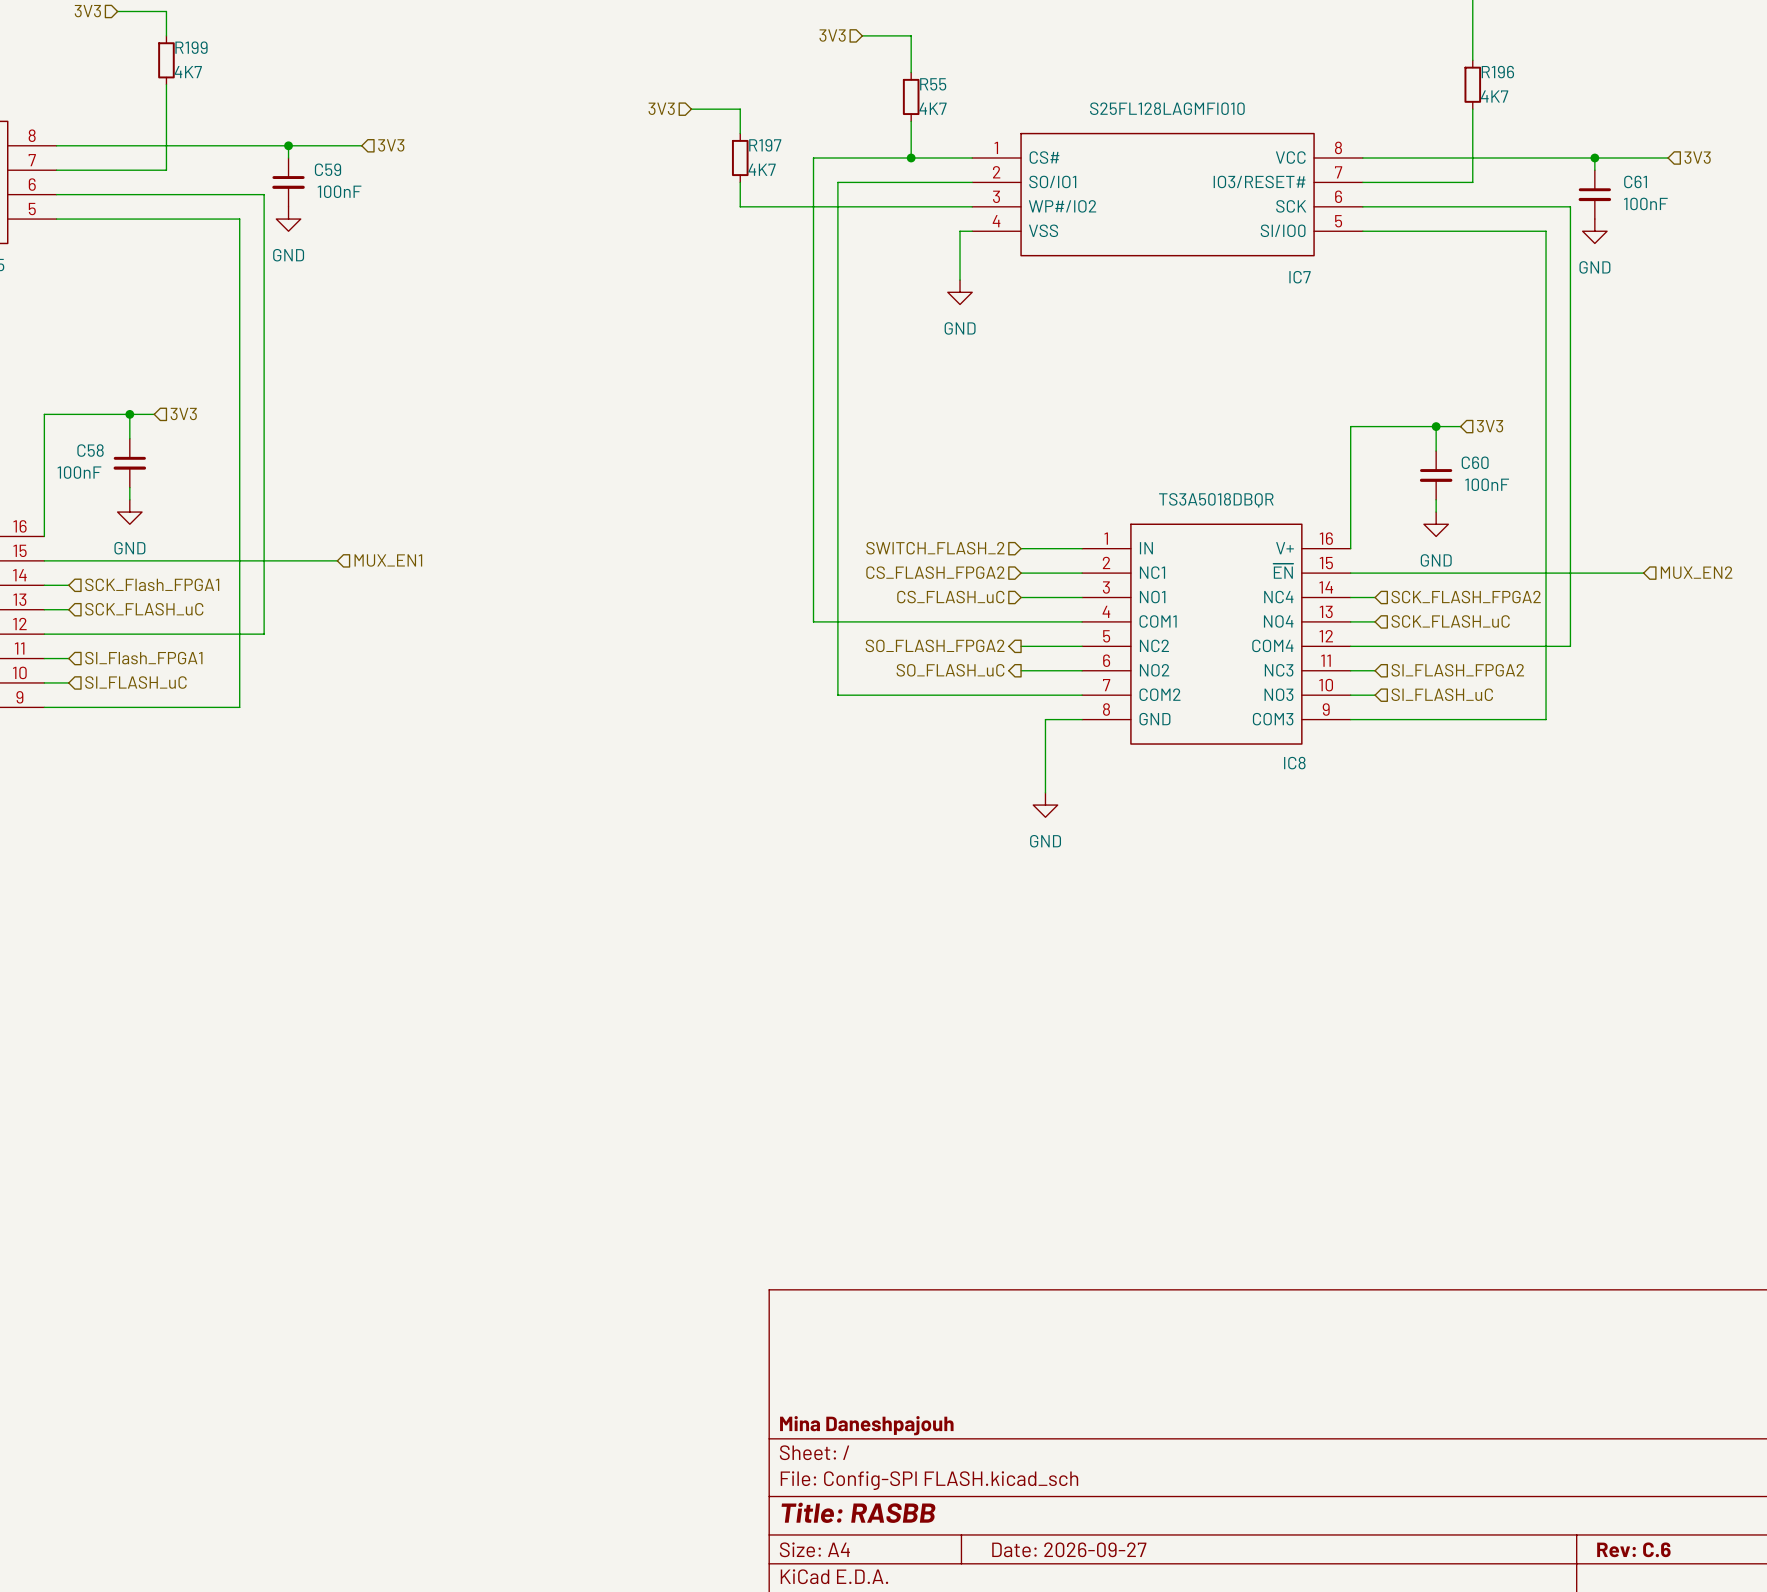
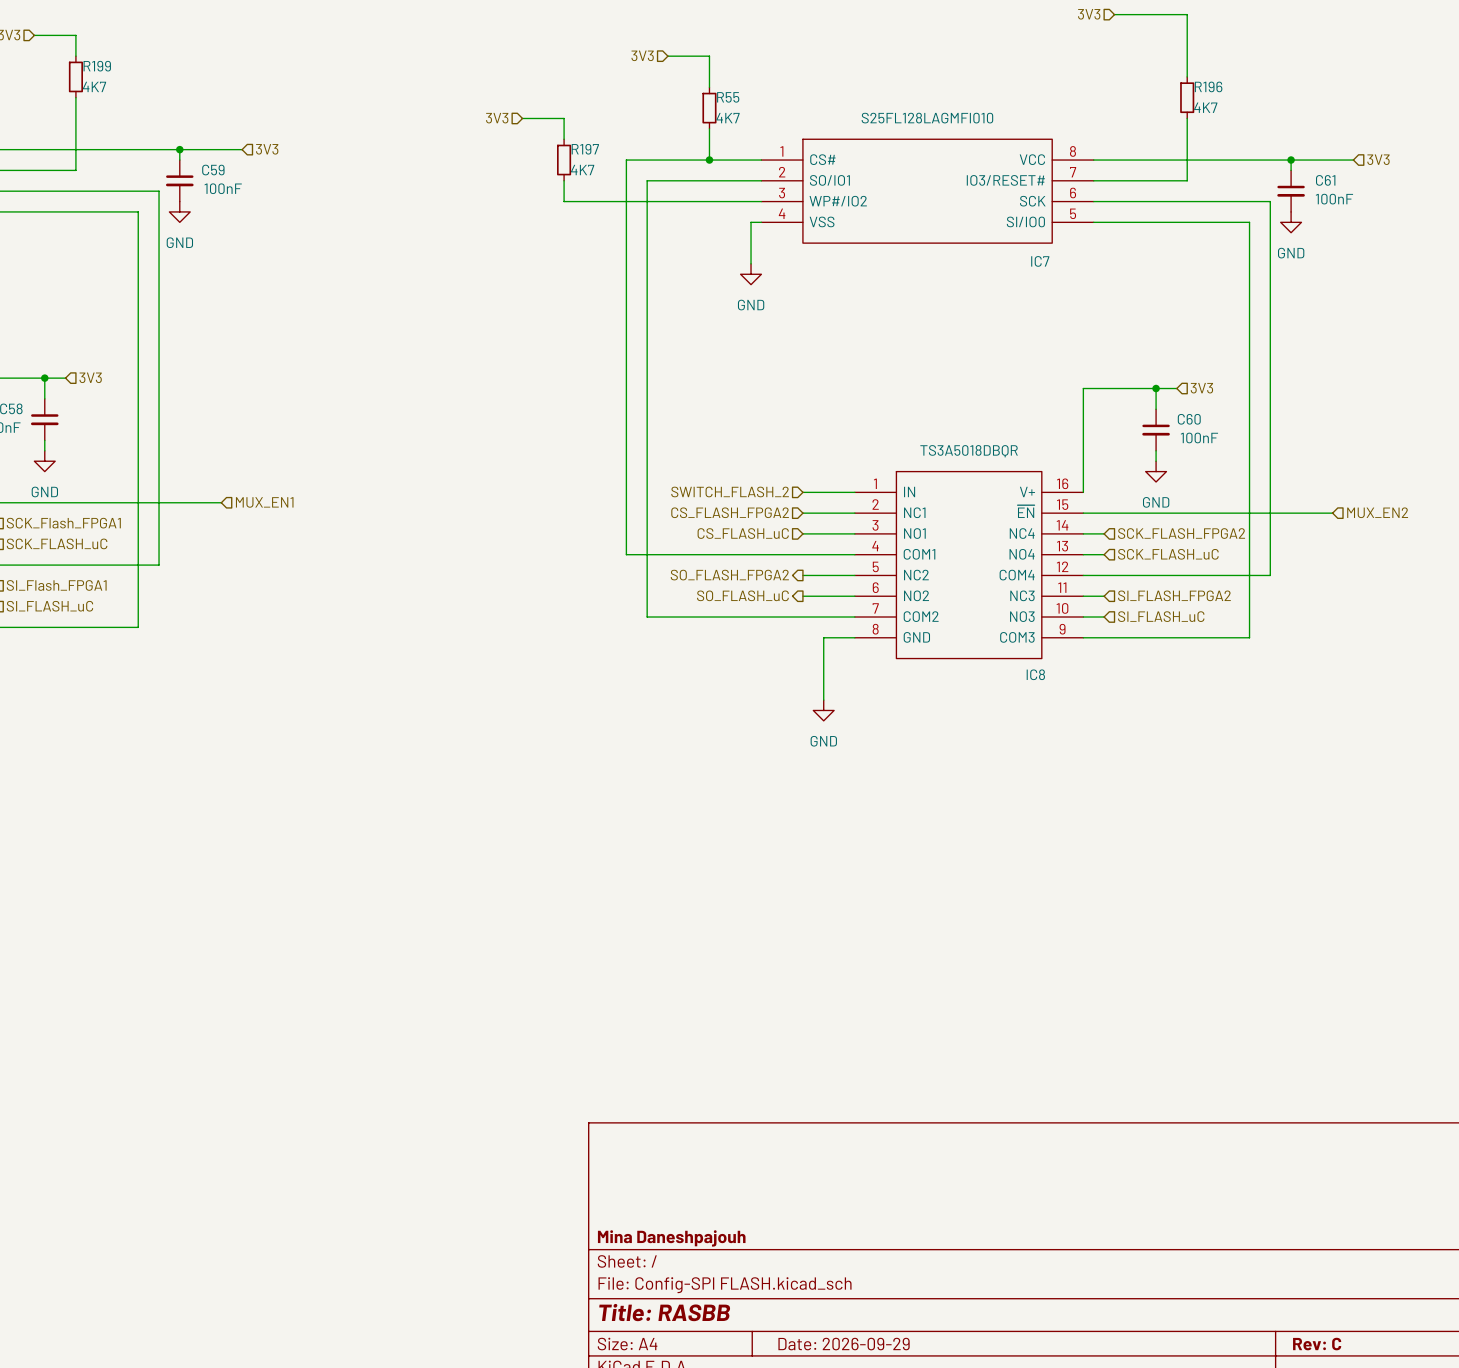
title block: Date: 2026-09-27 (1069, 1549) -> Date: 2026-09-29 (844, 1344)
title block: Rev: C.6 (1633, 1549) -> Rev: C (1317, 1344)

